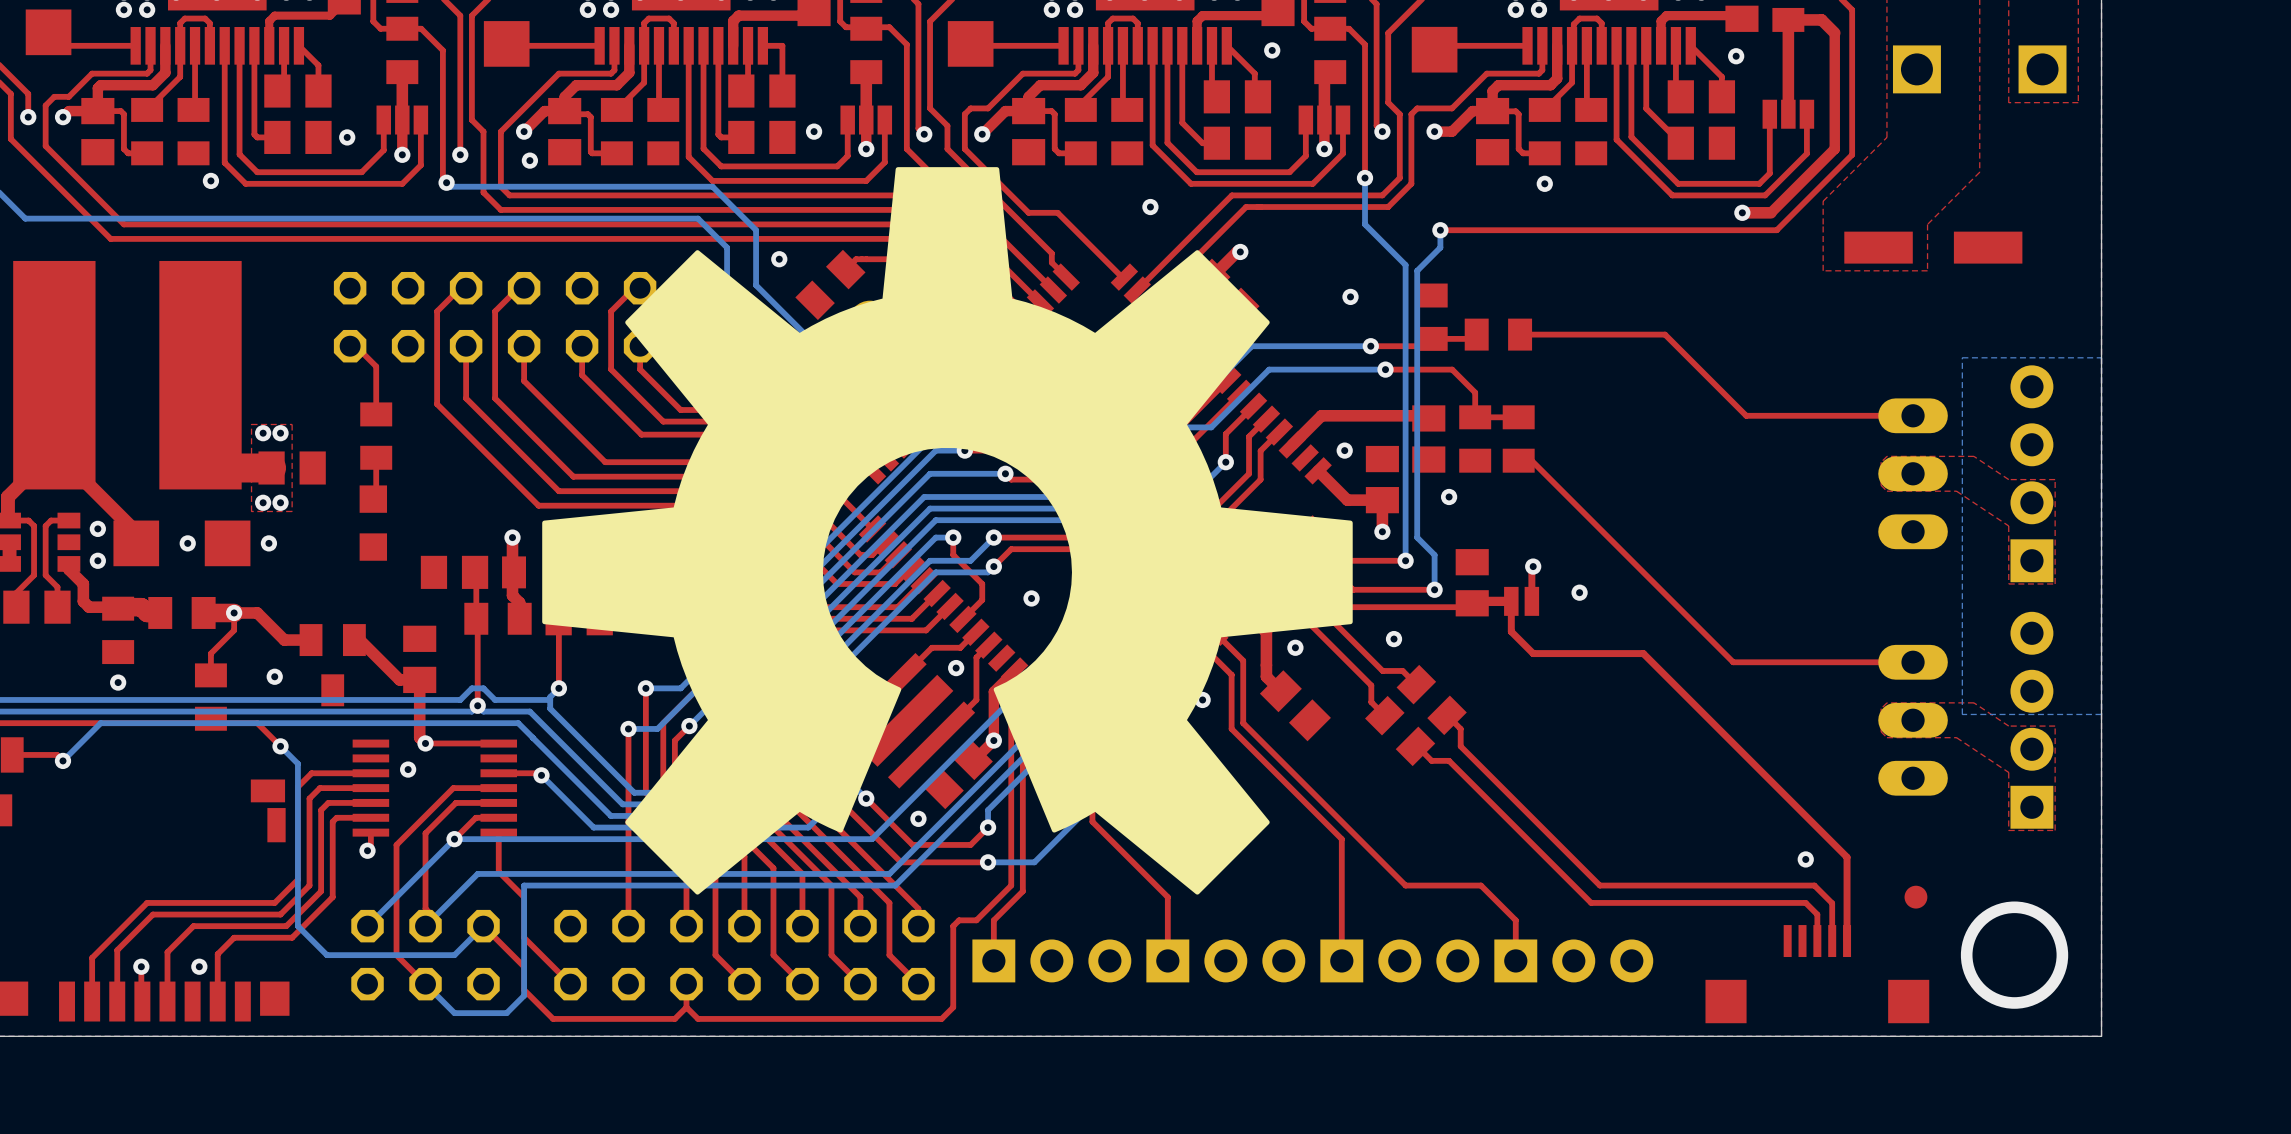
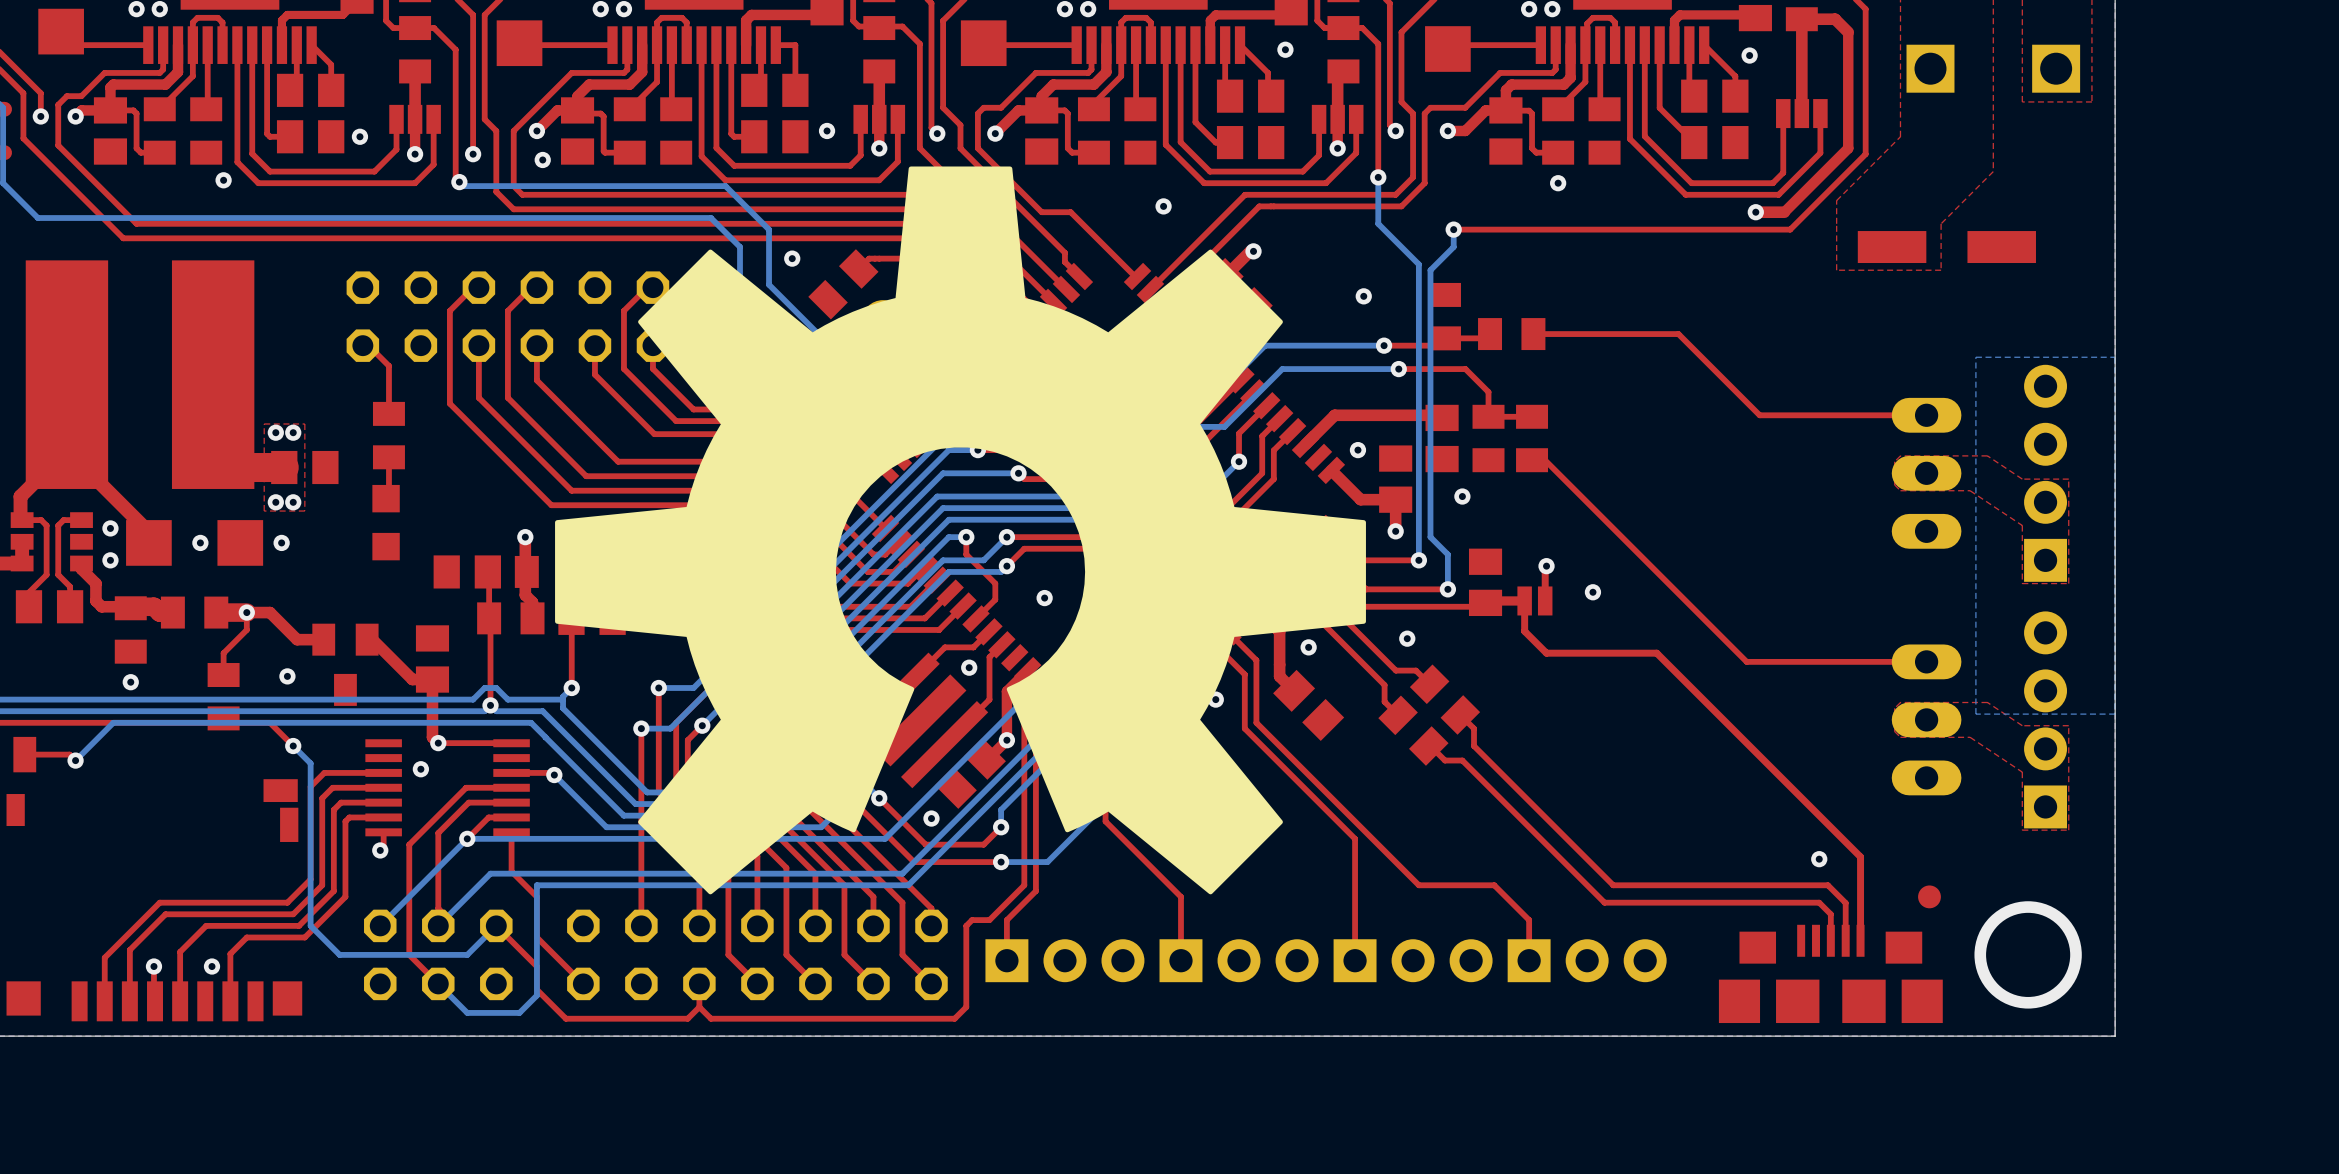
part footprint: [1705, 925, 1930, 1024] -> [1718, 924, 1943, 1024]

